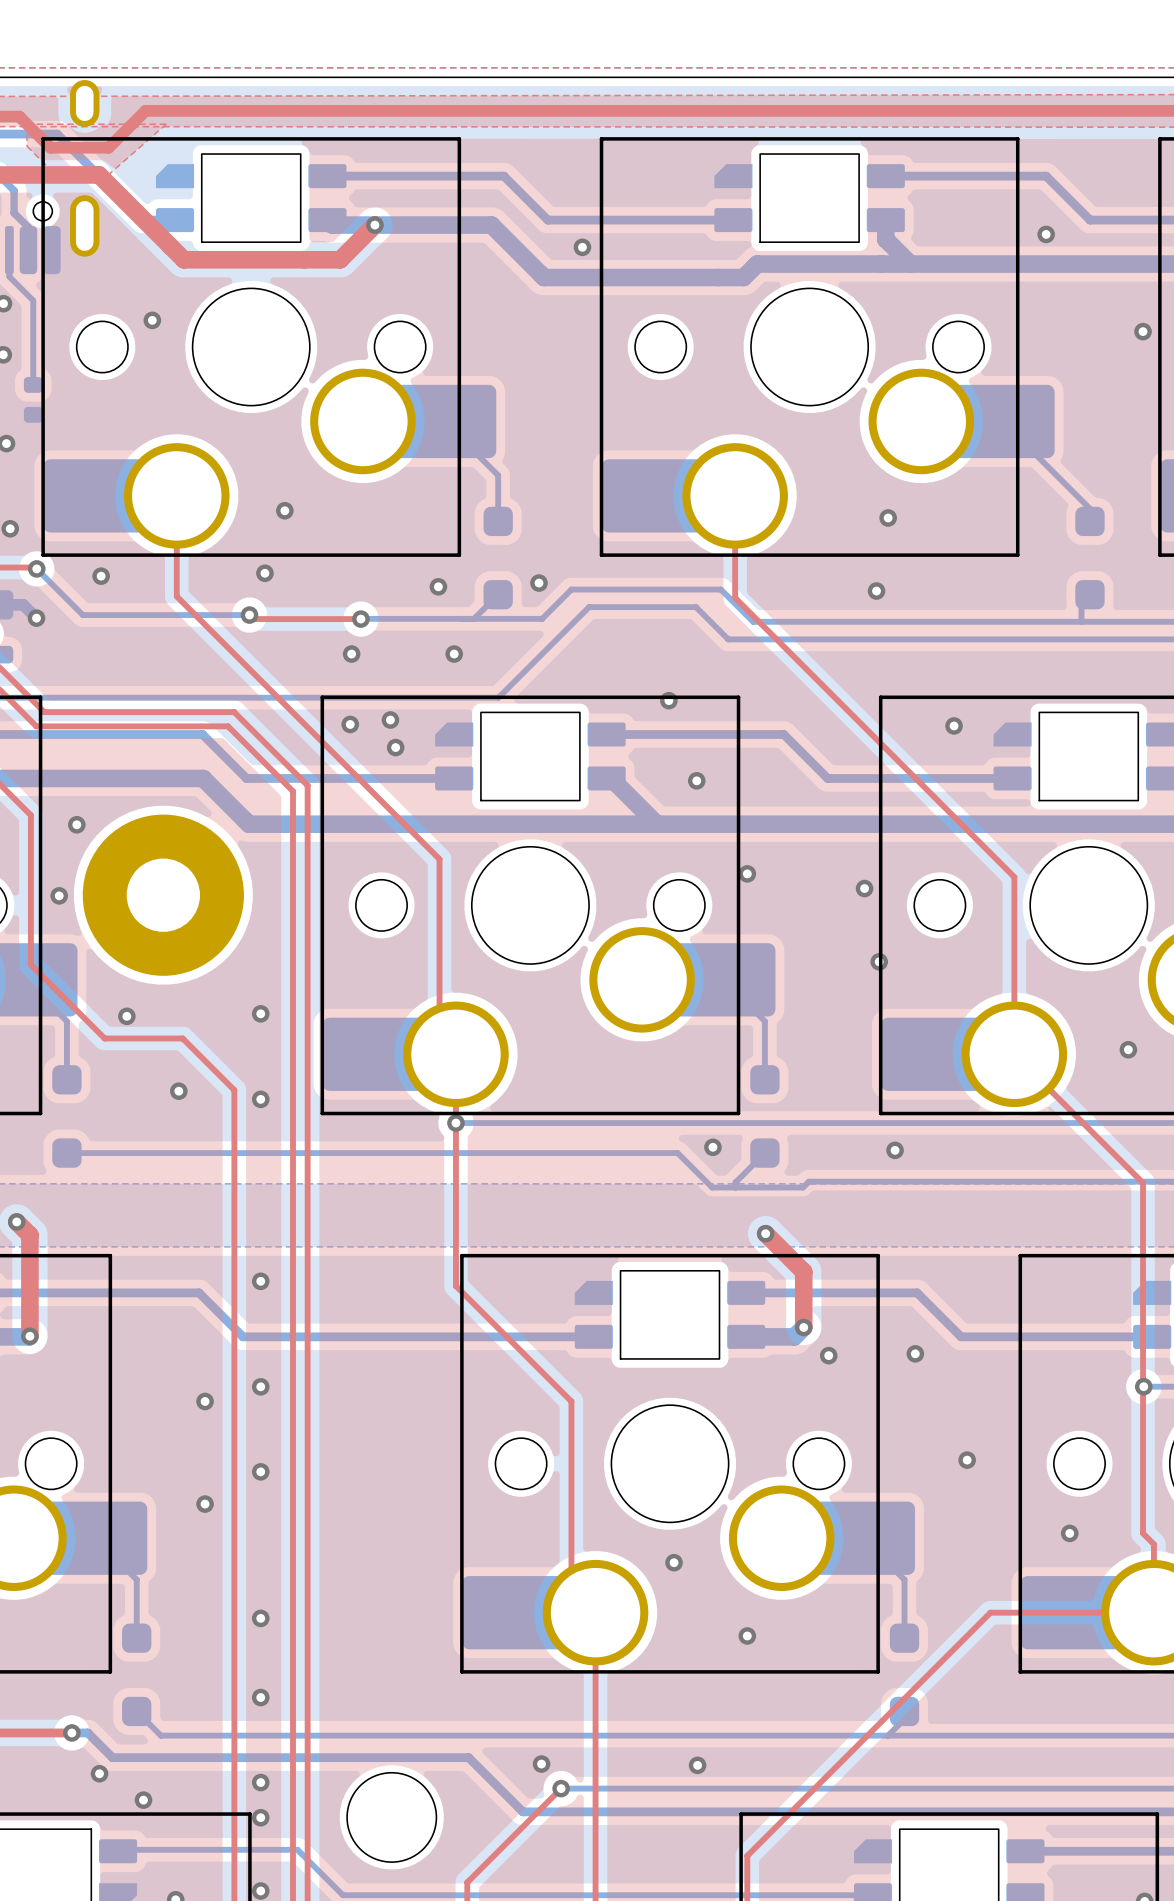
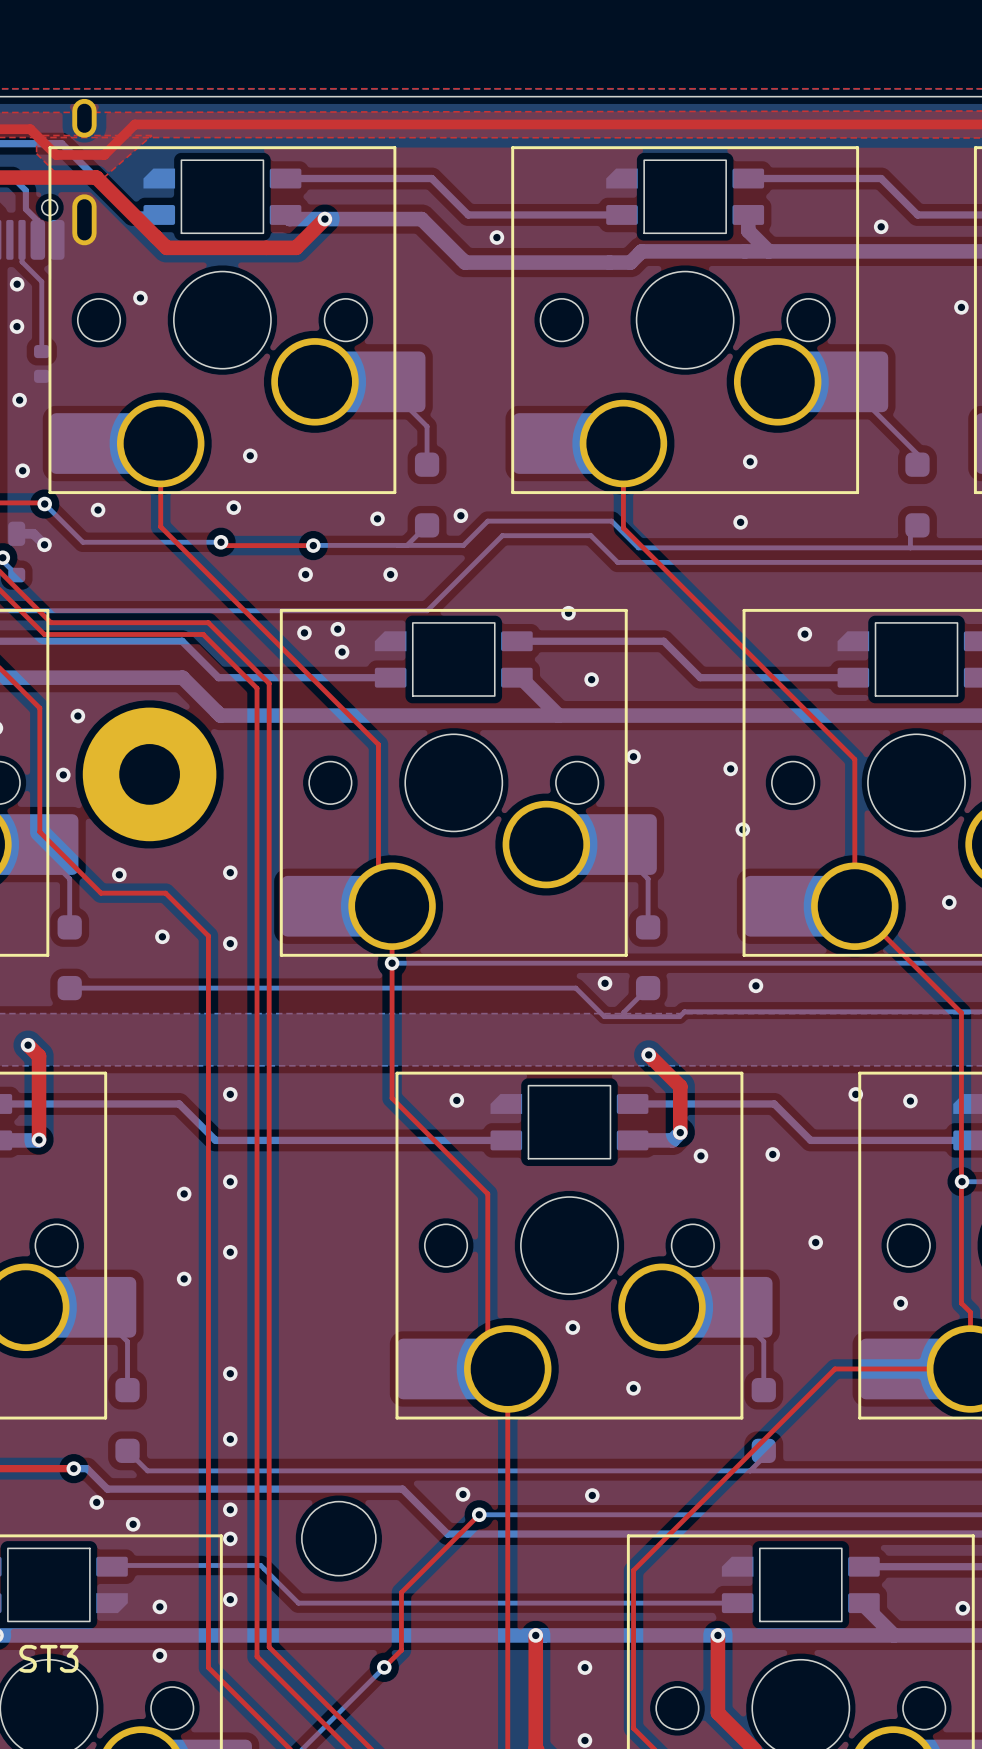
via: none -> (855, 1094)
via: none -> (456, 1100)
via: none -> (910, 1101)

